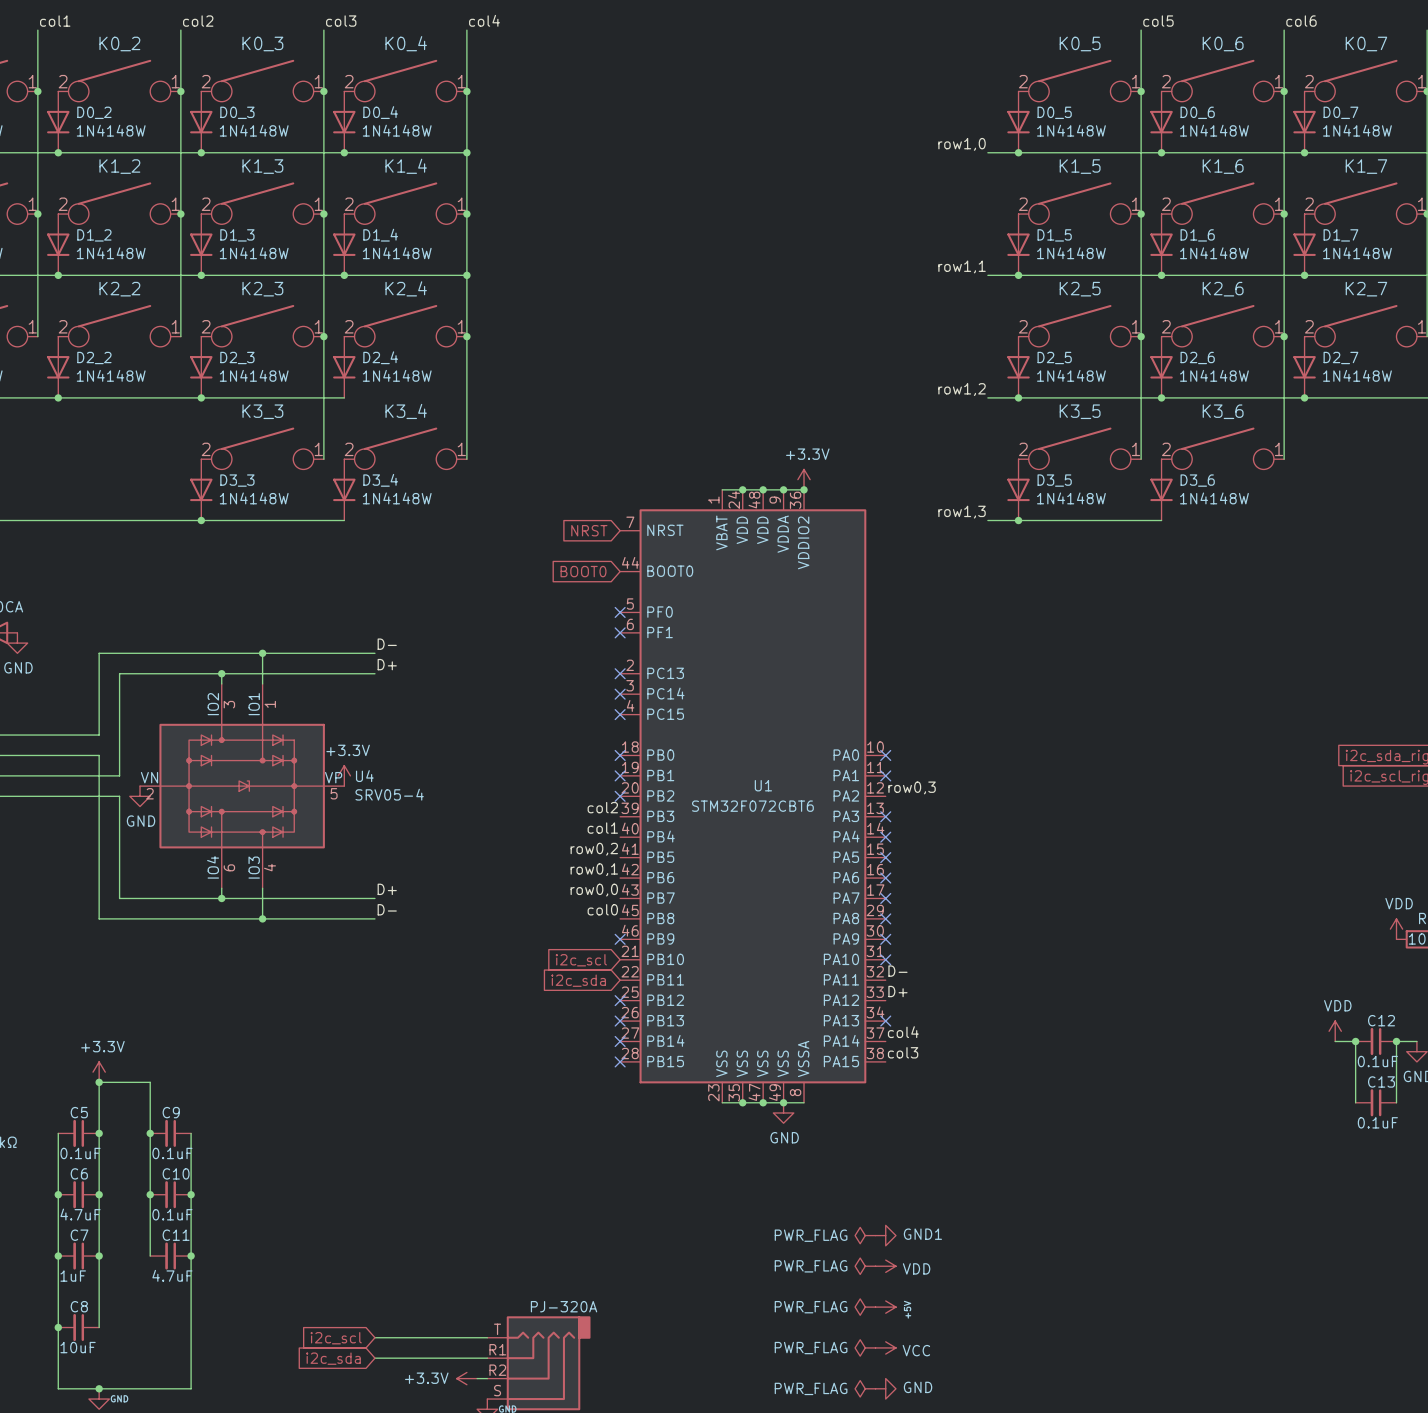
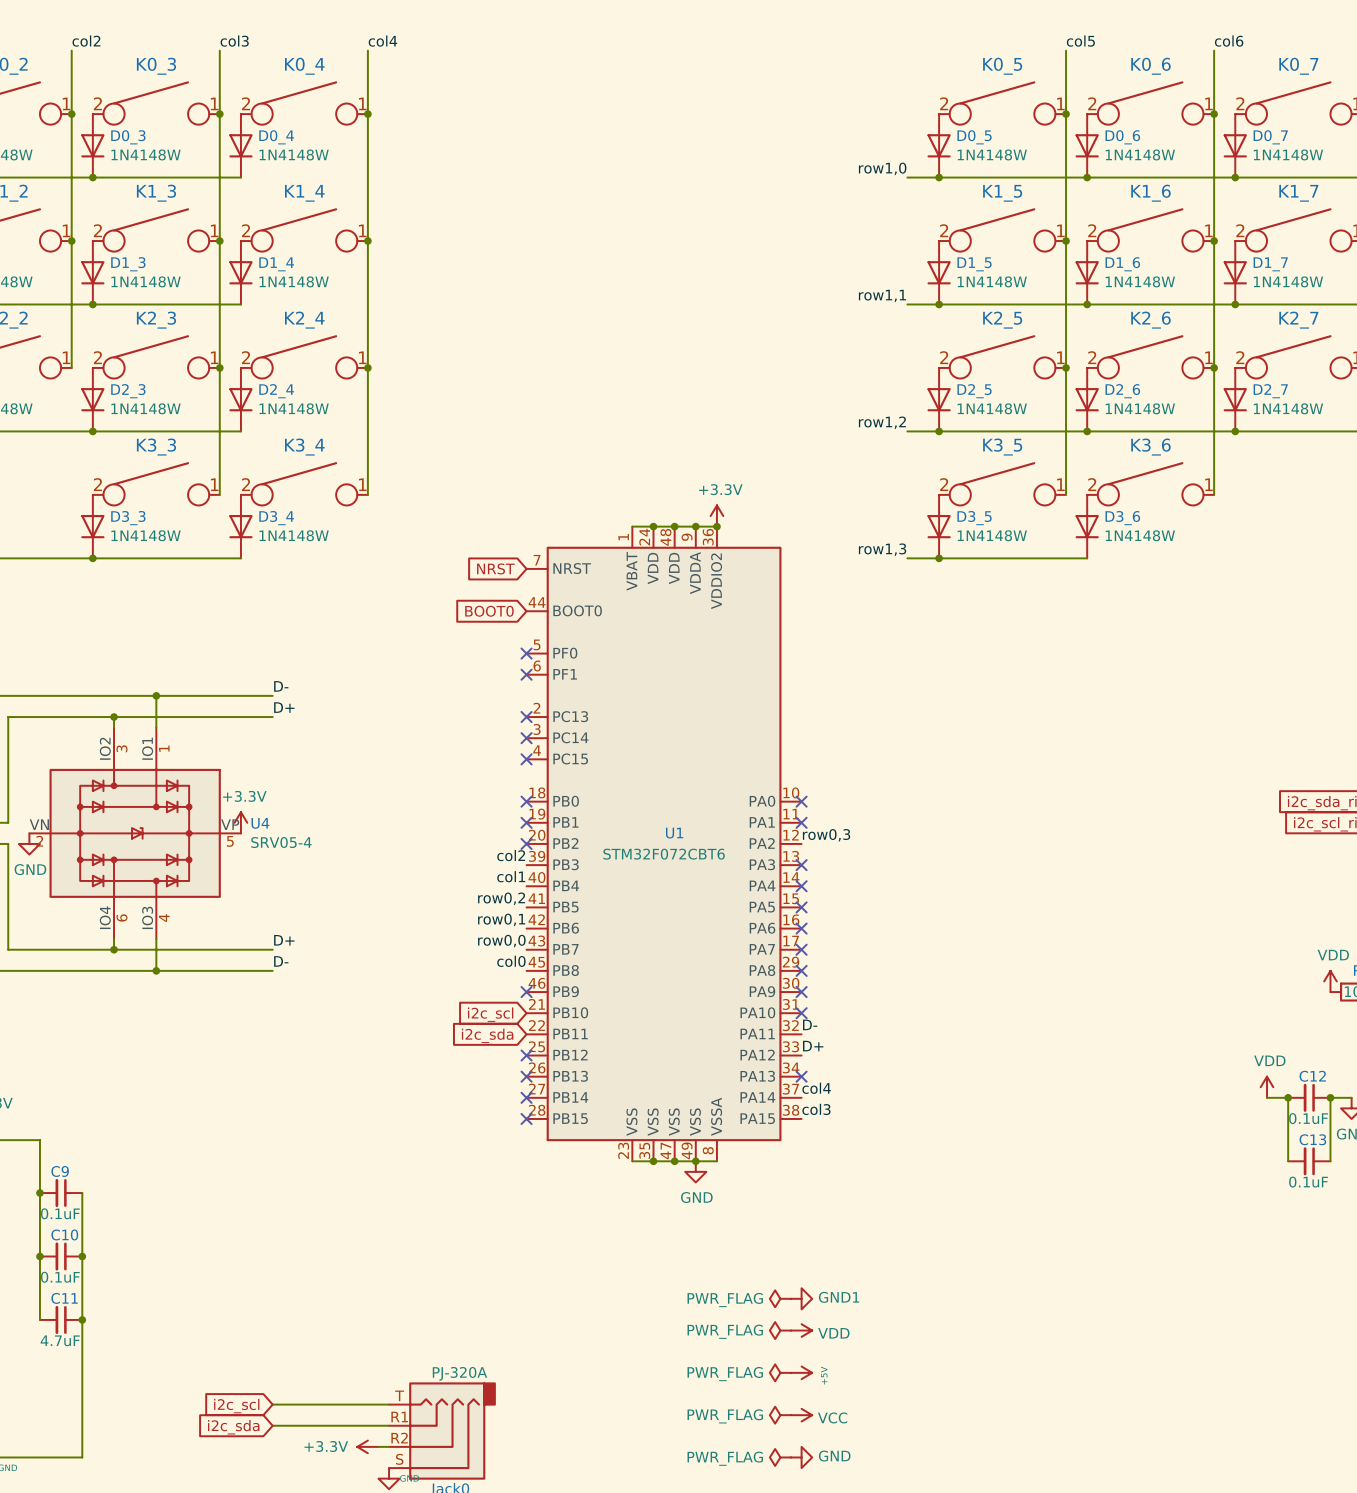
wire: (344, 152) (466, 152) -> none
junction: (344, 152) -> none
junction: (466, 152) -> none
wire: (344, 275) (466, 275) -> none
junction: (344, 275) -> none
junction: (466, 275) -> none

